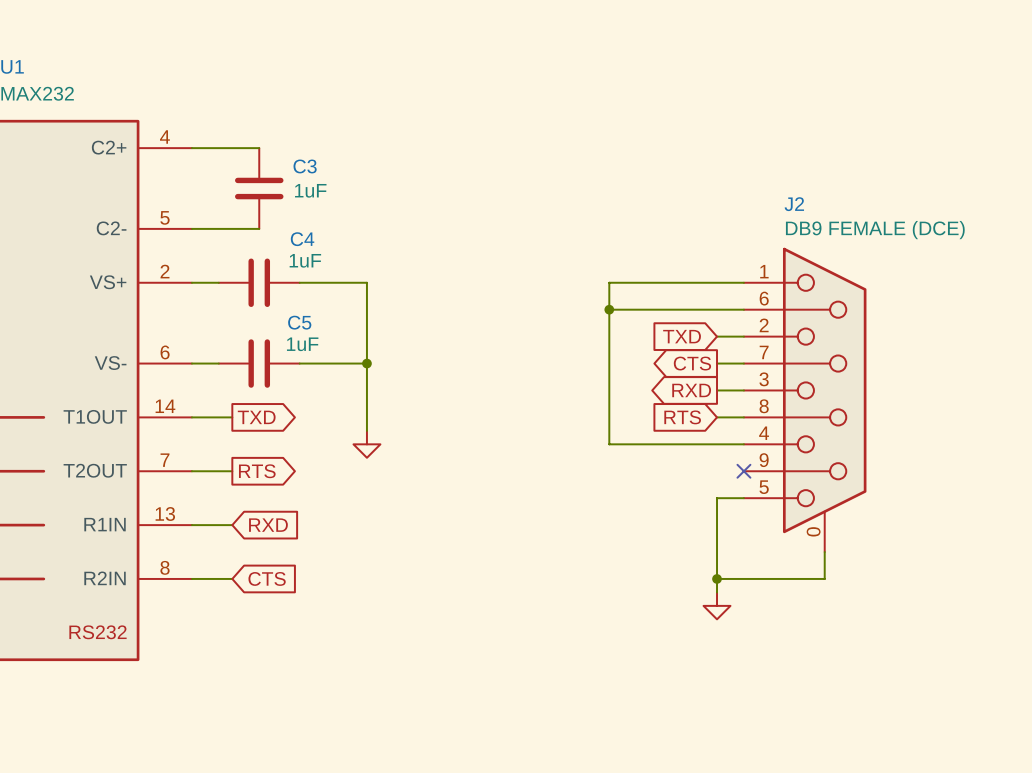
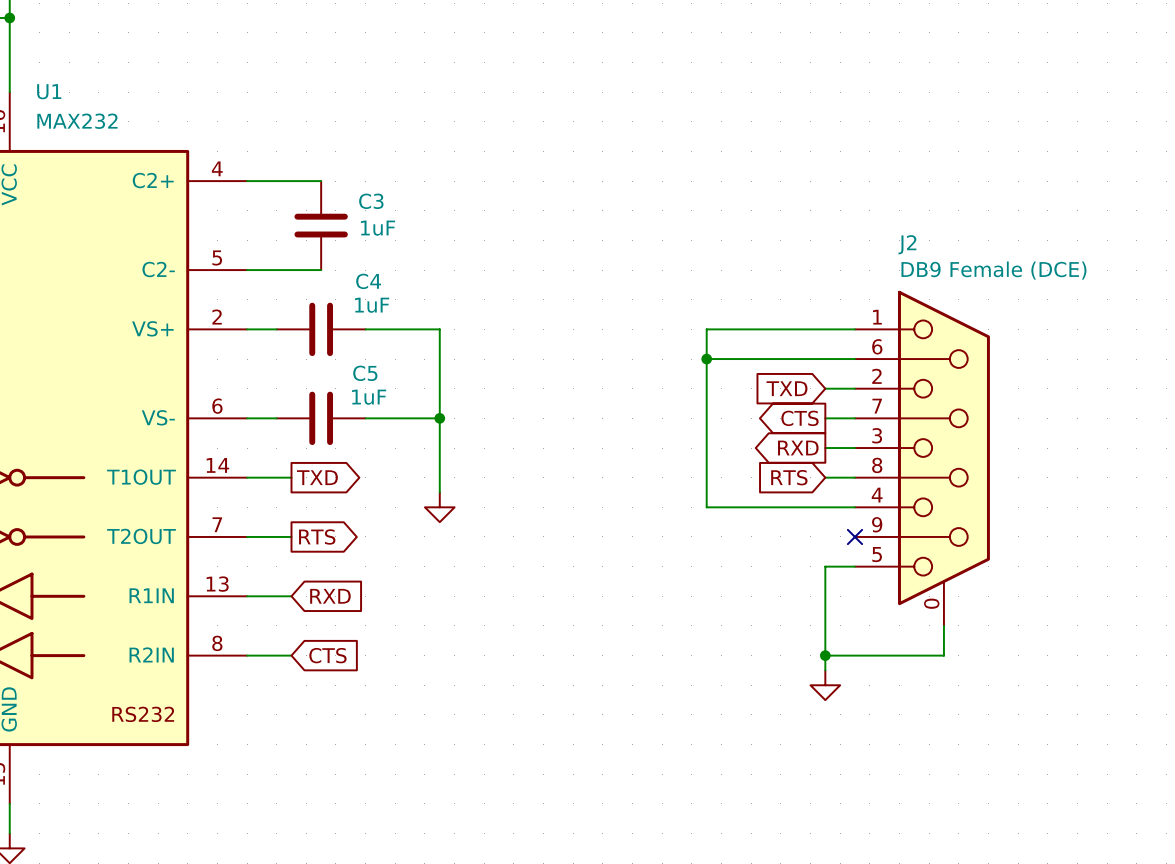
J2 value: DB9 FEMALE (DCE) (875, 230) -> DB9 Female (DCE) (993, 270)

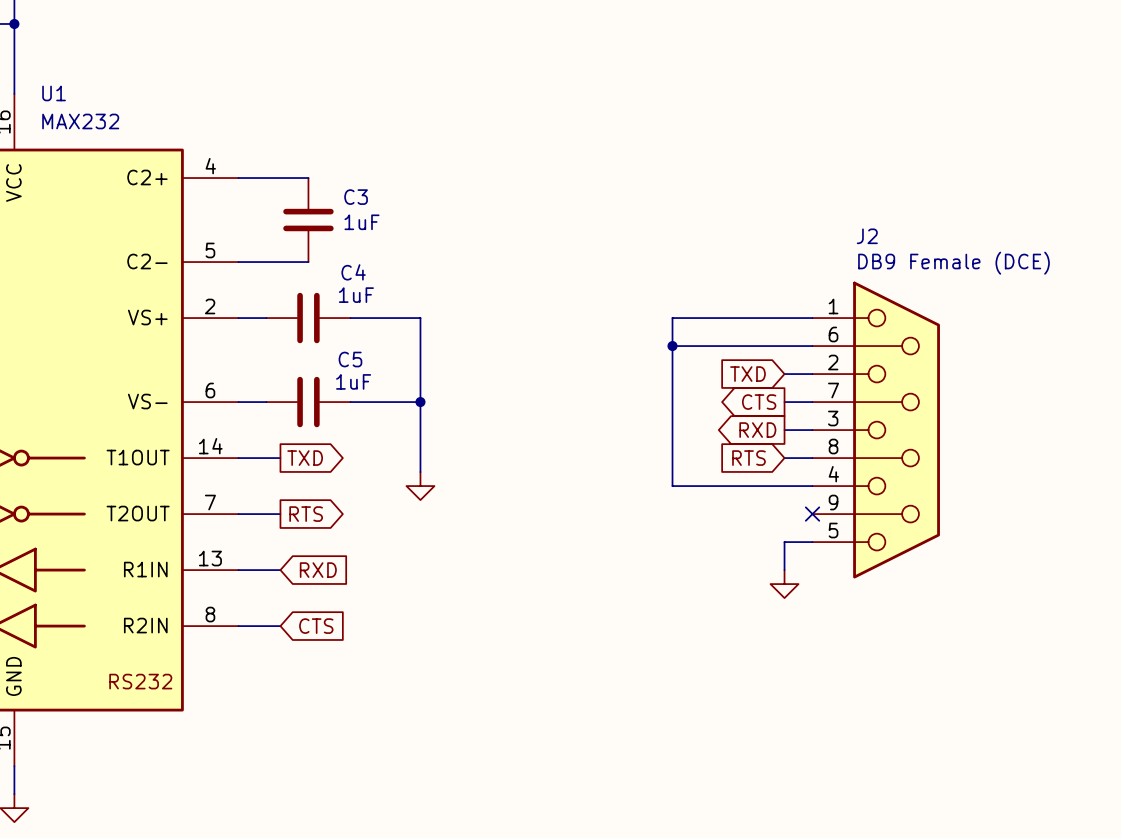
J2 symbol: [854, 290, 990, 626] -> [812, 281, 940, 579]
wire: (825, 596) (825, 670) -> none
wire: (943, 625) (943, 655) (825, 655) -> none
junction: (825, 655) -> none
power symbol position: (825, 685) -> (784, 584)

